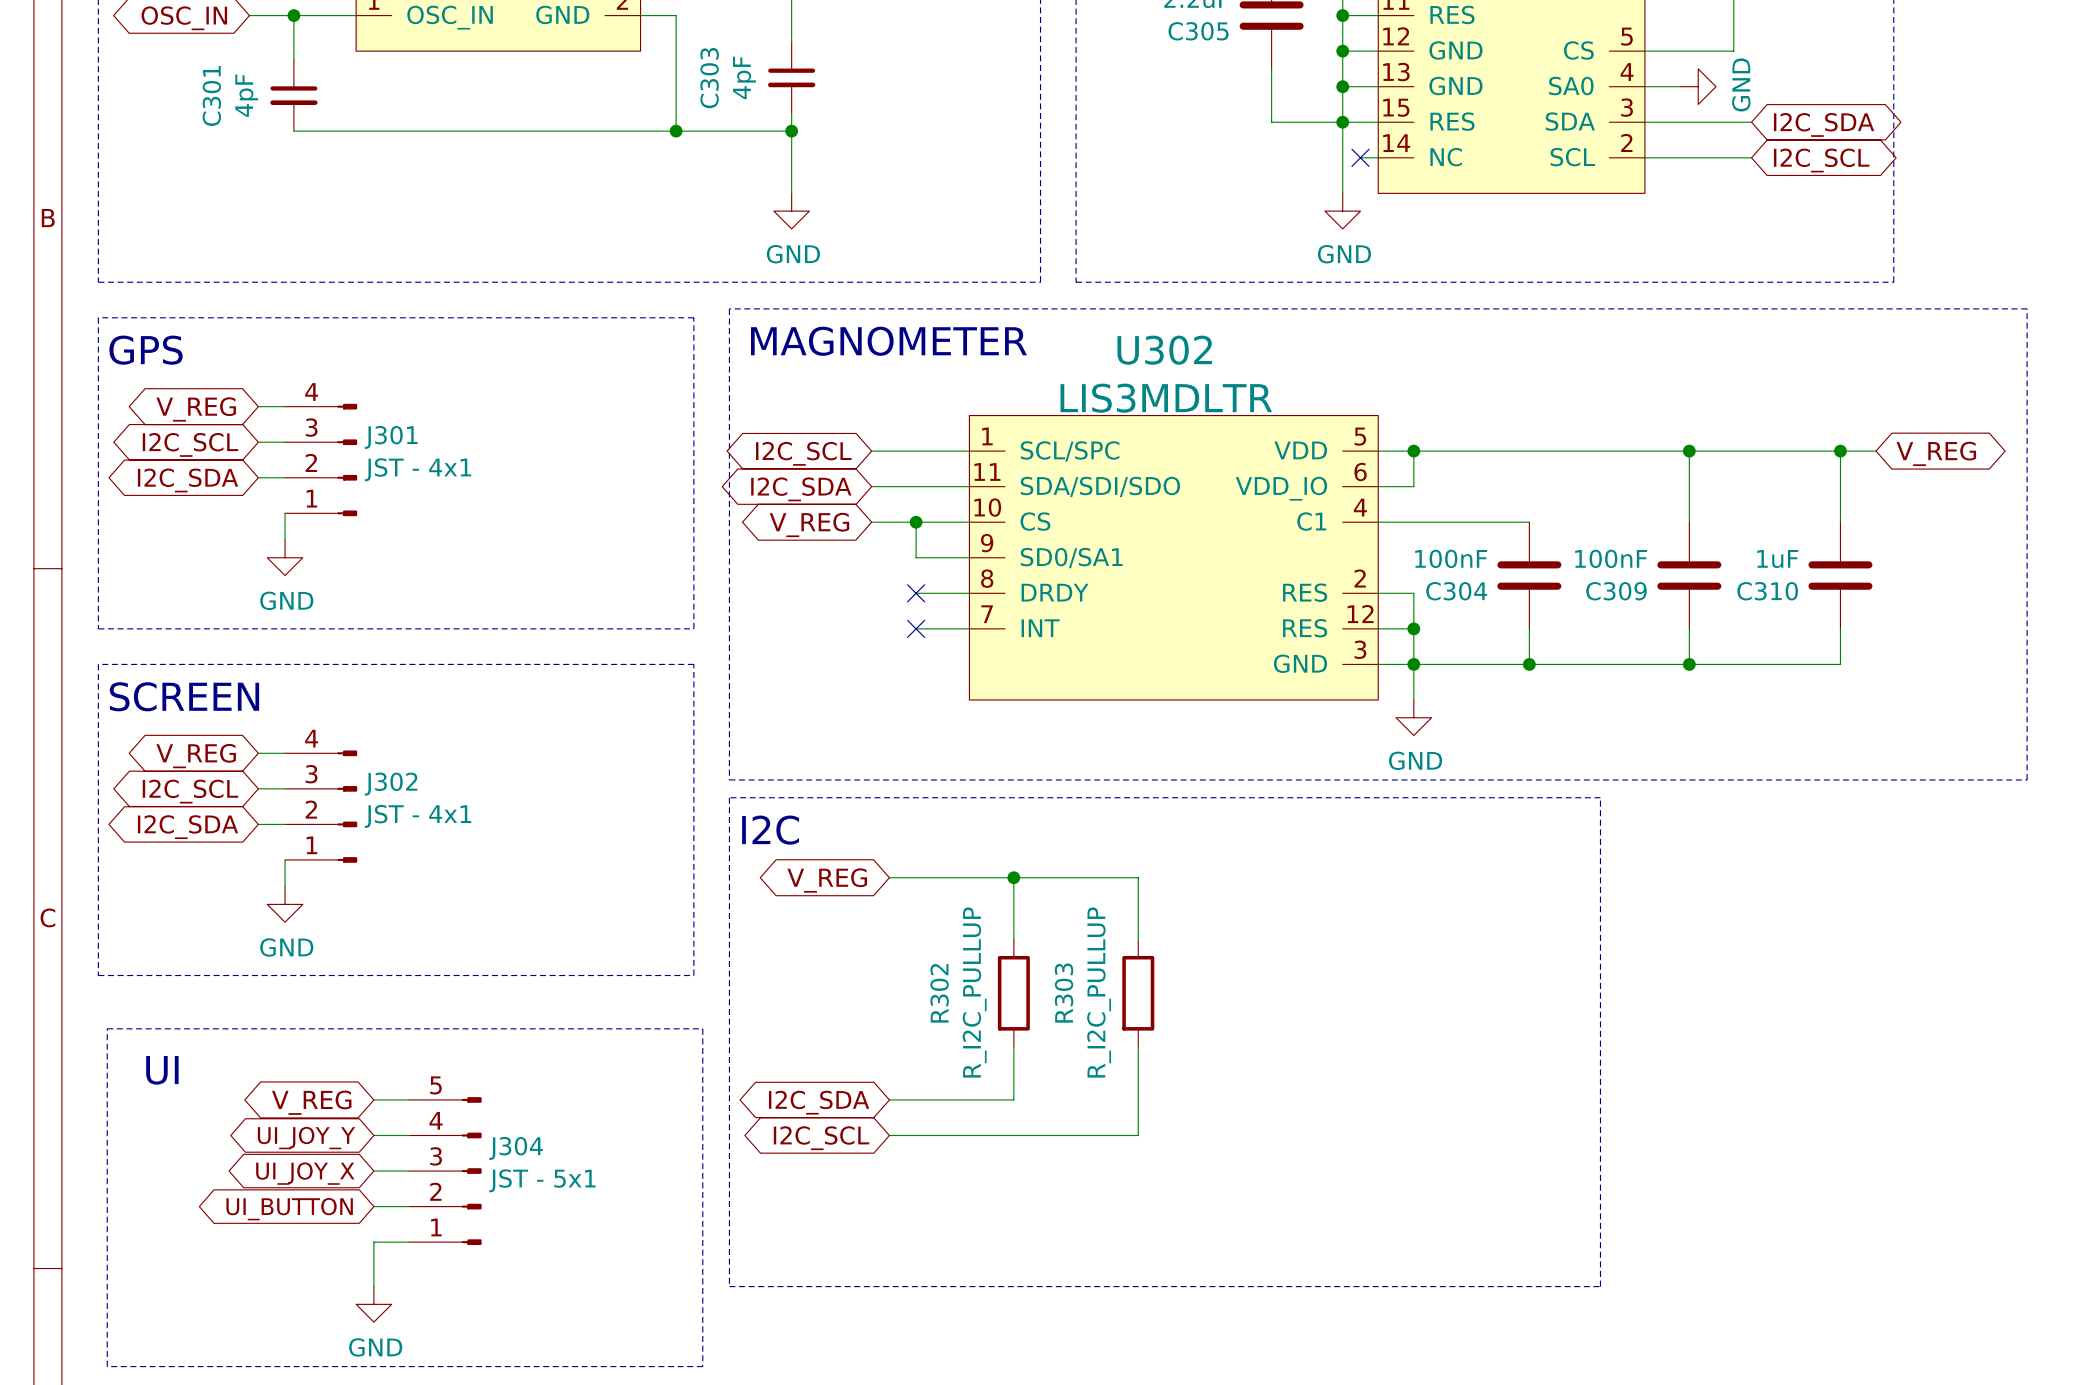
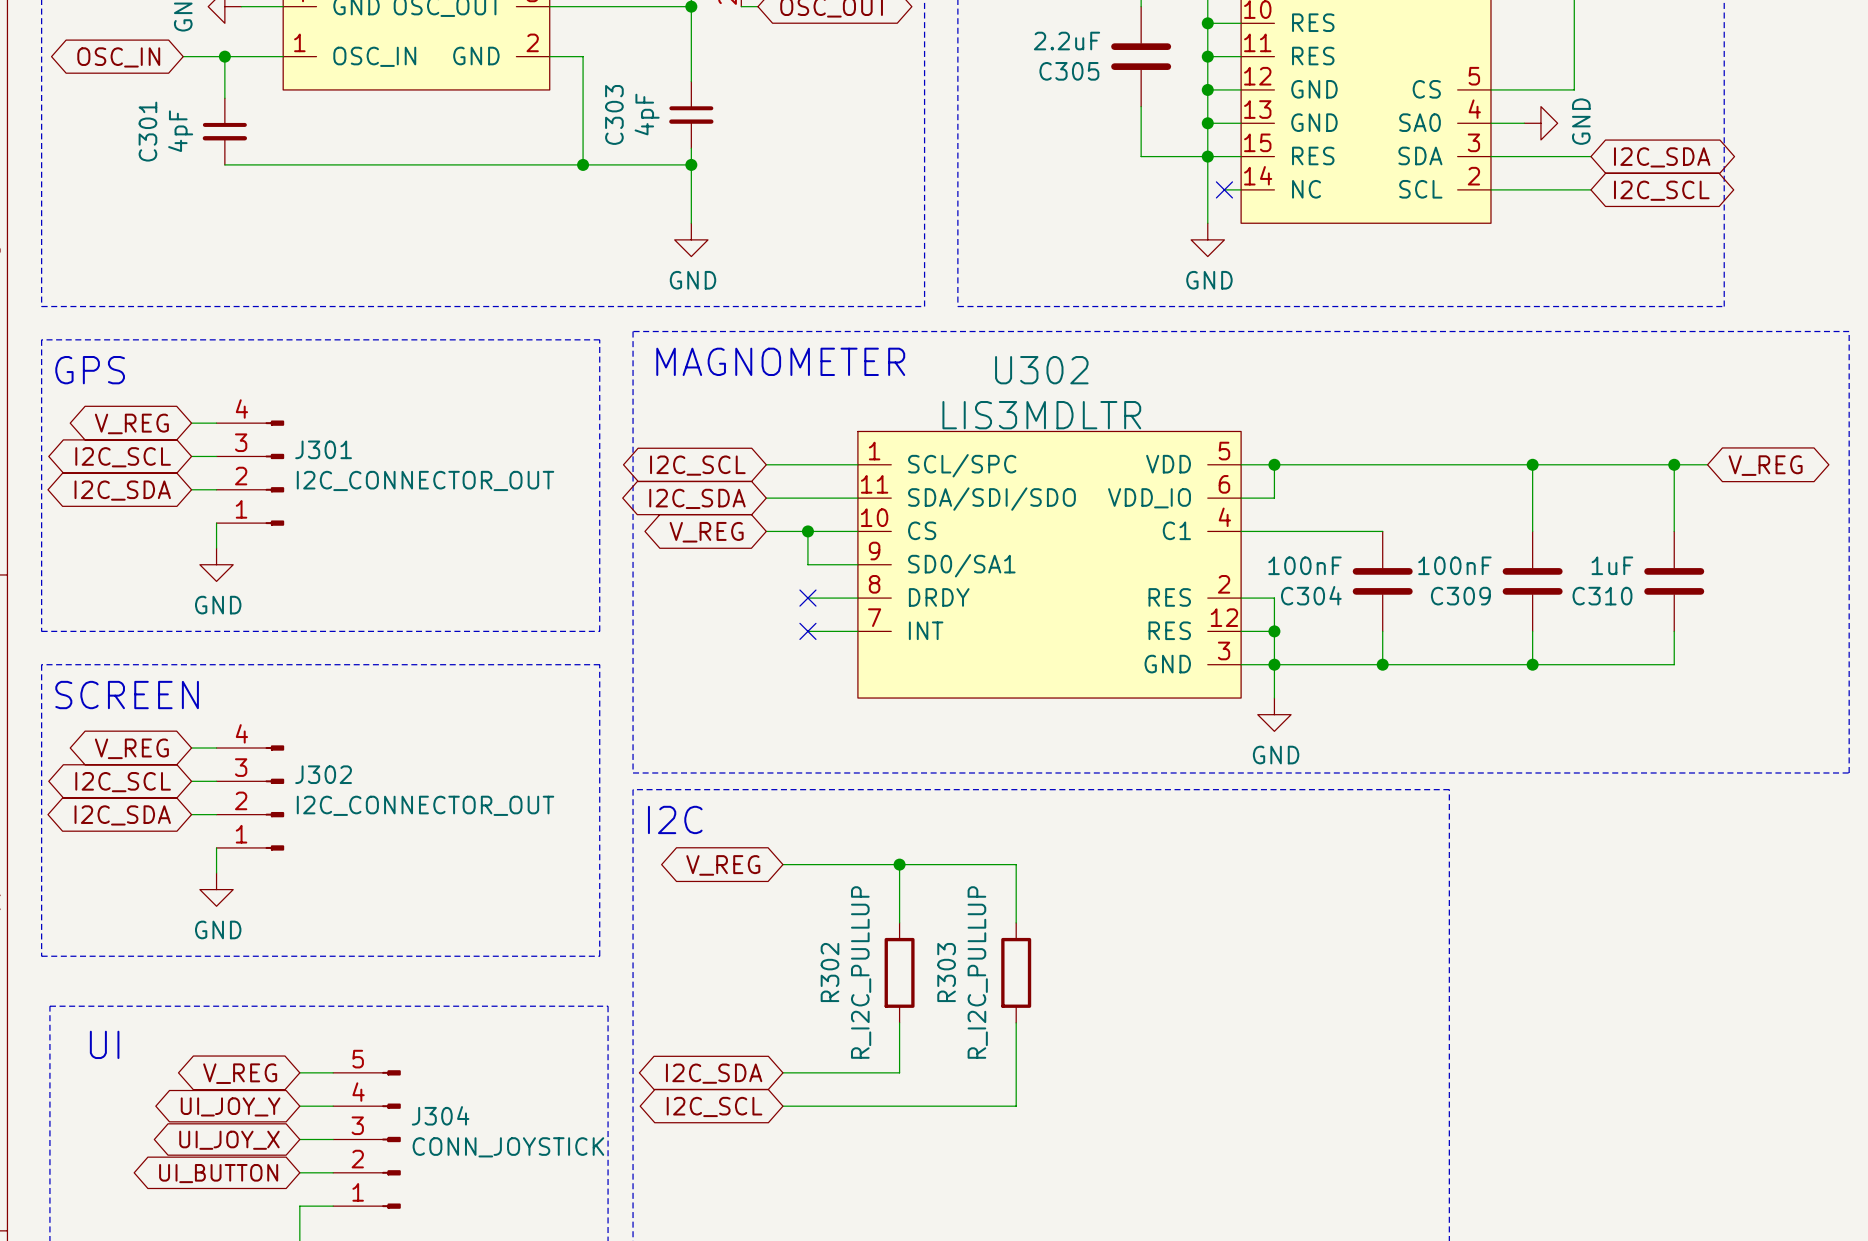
J301 value: JST - 4x1 (417, 469) -> I2C_CONNECTOR_OUT (425, 480)
J302 value: JST - 4x1 (417, 816) -> I2C_CONNECTOR_OUT (425, 805)
J304 value: JST - 5x1 (542, 1180) -> CONN_JOYSTICK (508, 1147)

